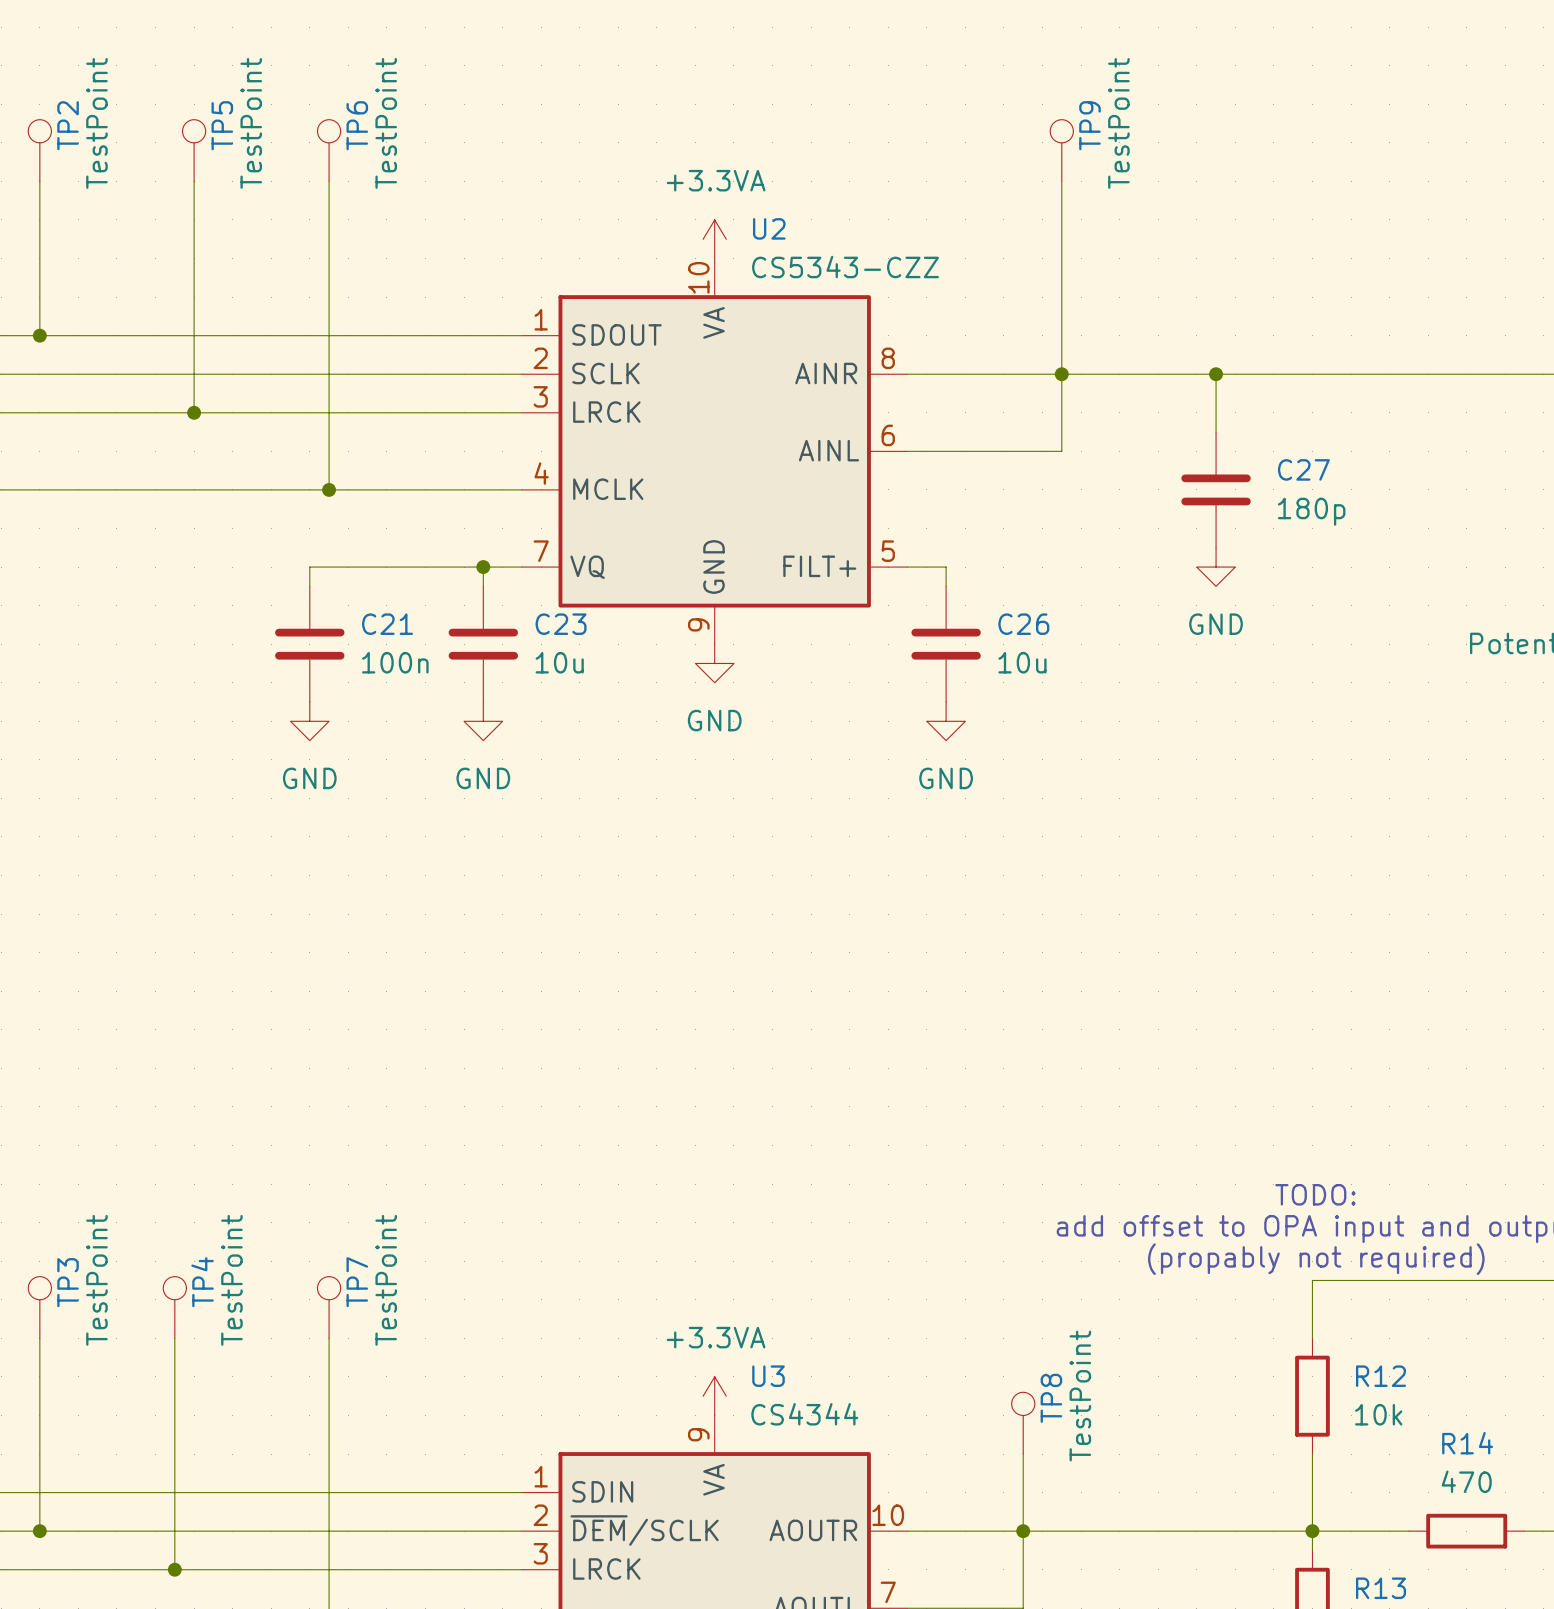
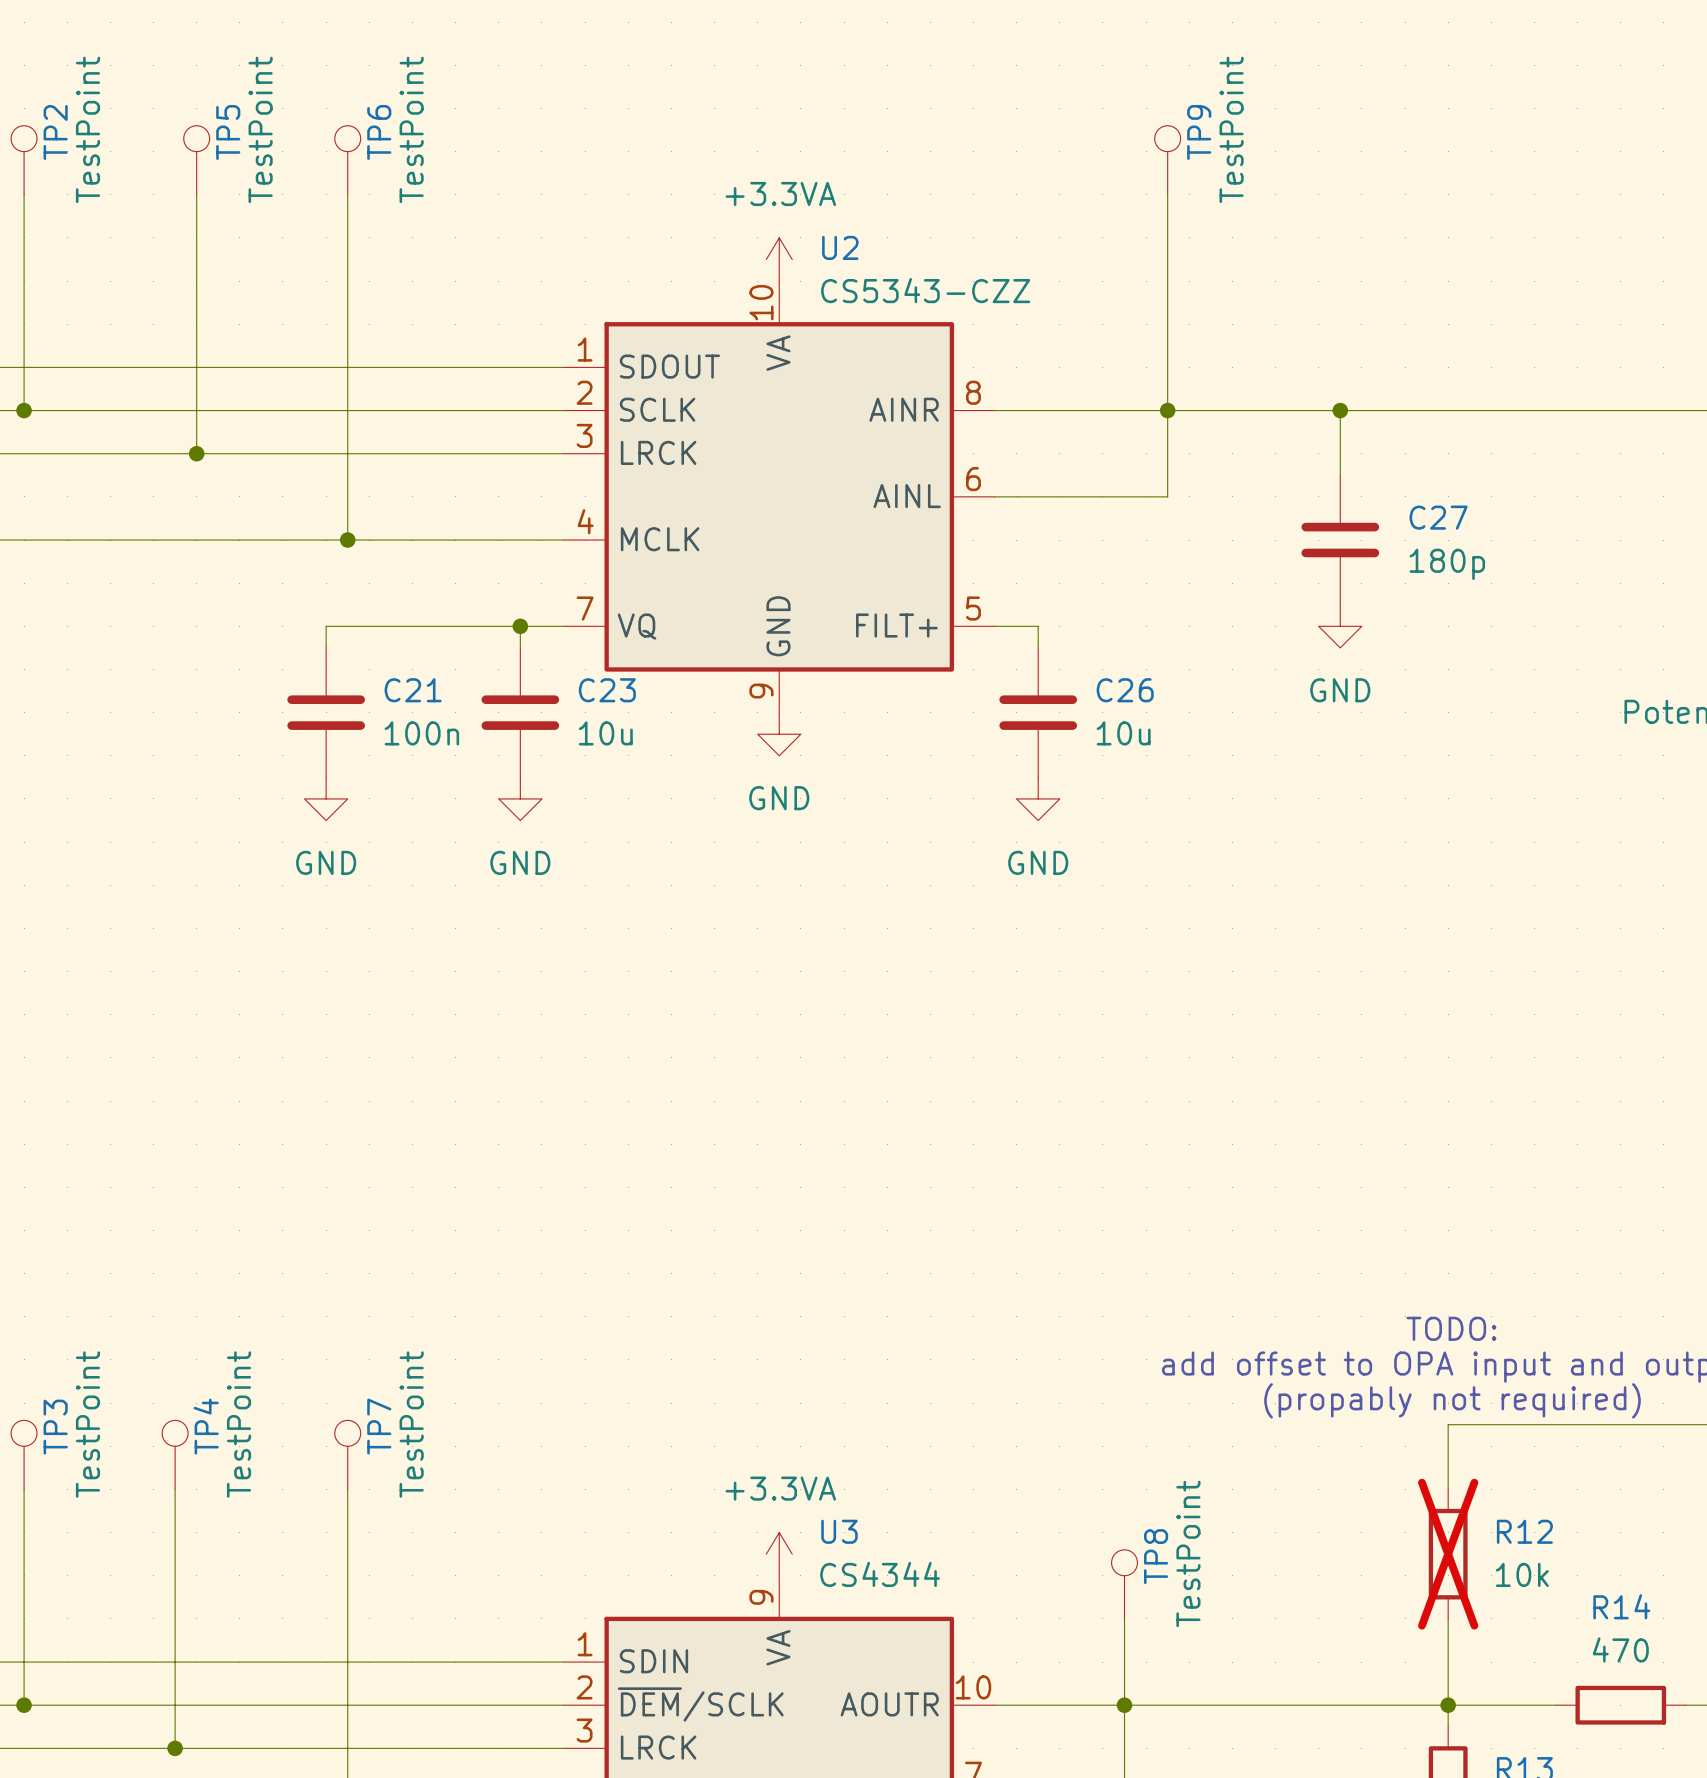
wire: none -> (24, 367) (24, 410)
junction position: (39, 335) -> (24, 410)
R12 do-not-place cross: none -> (1448, 1554)

